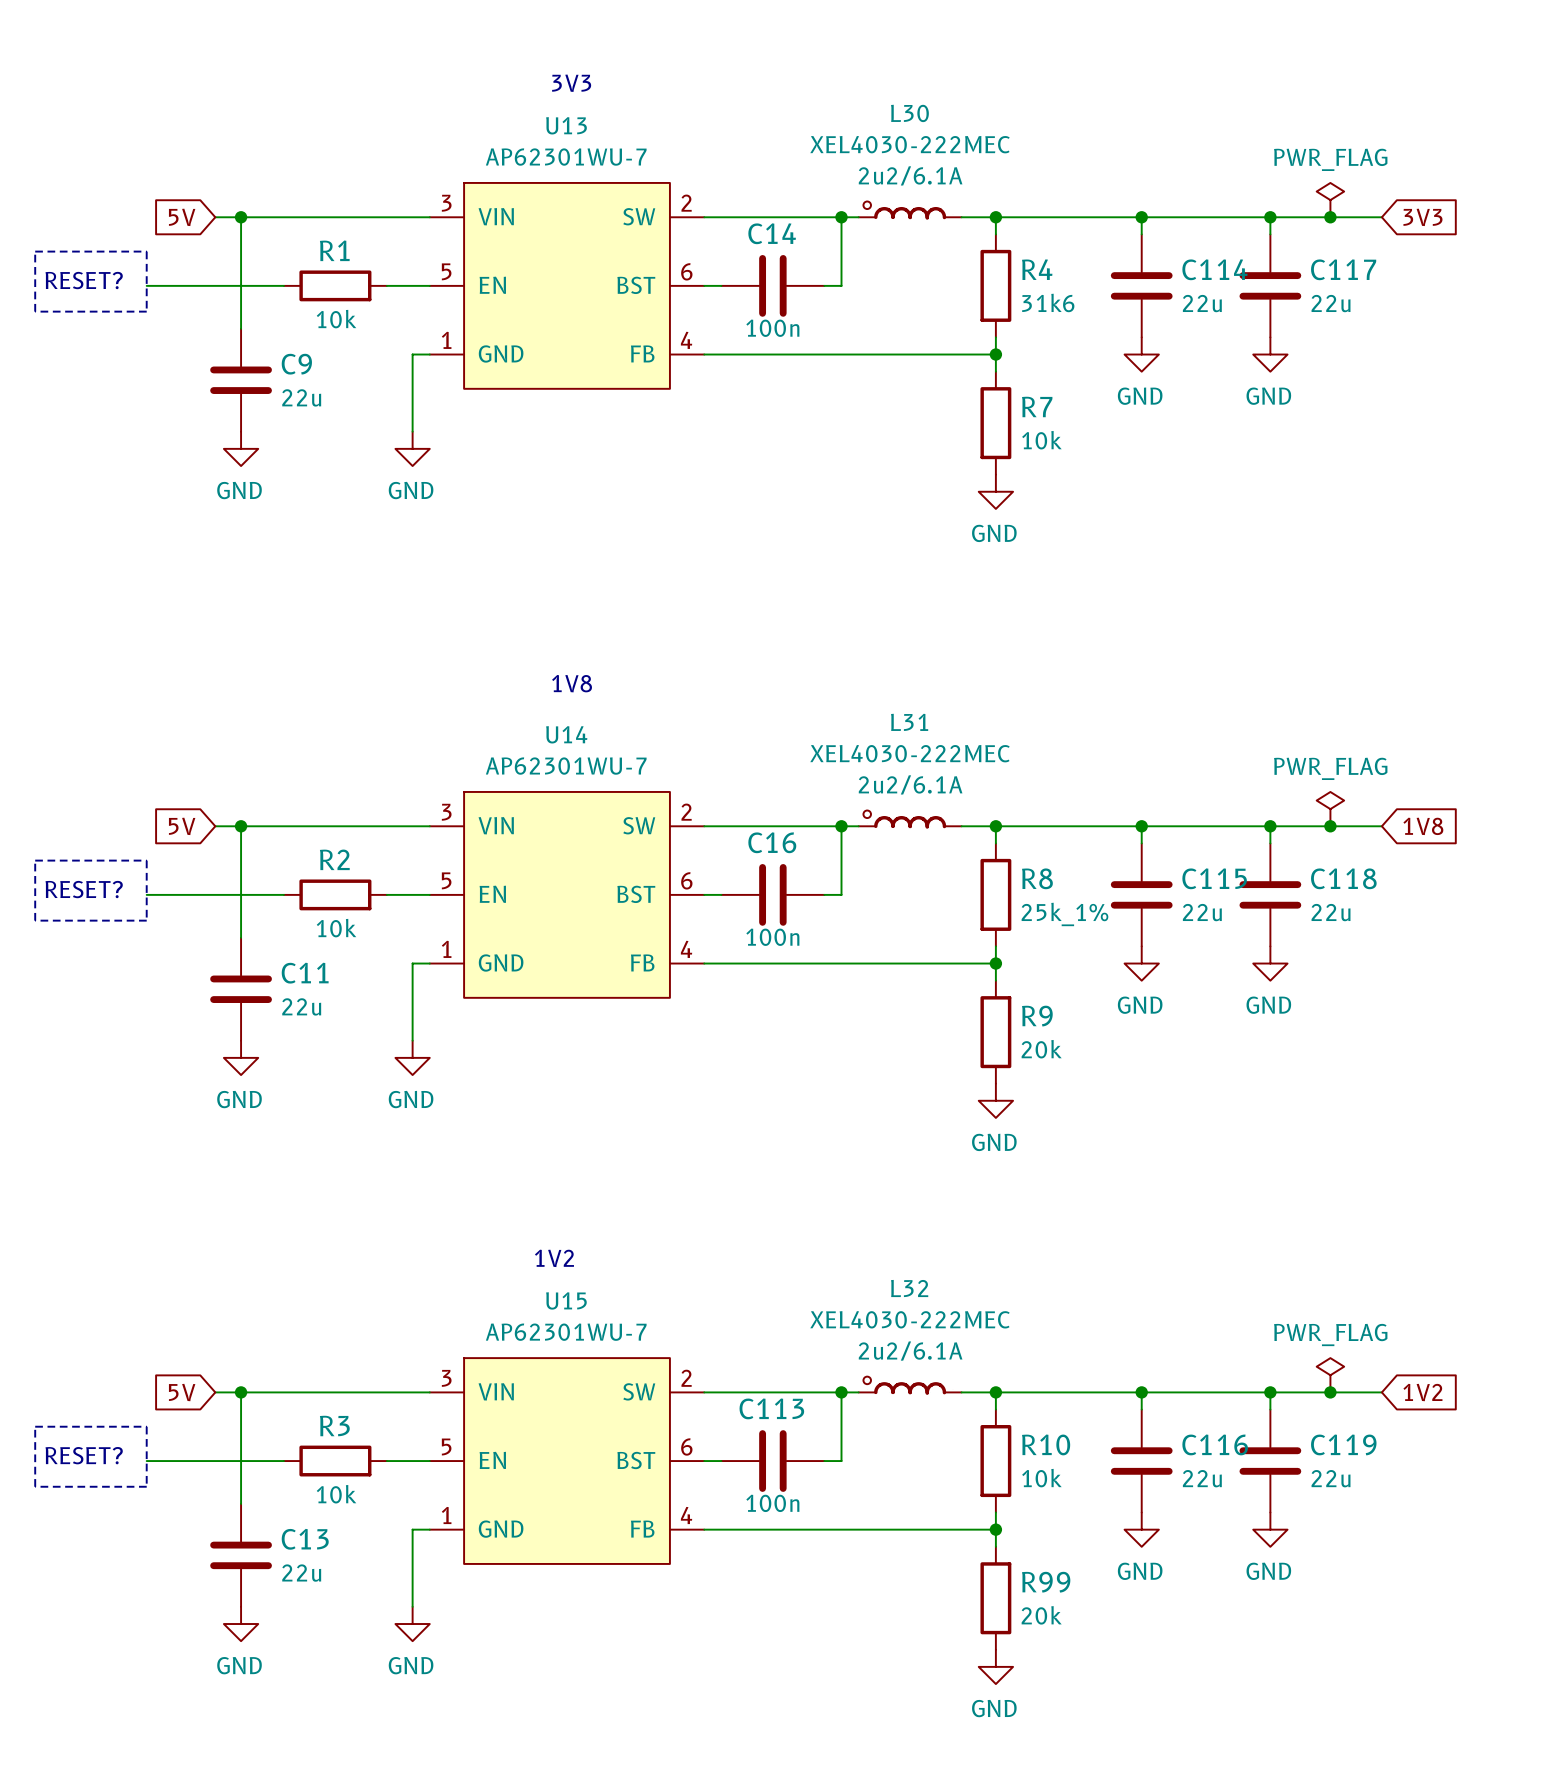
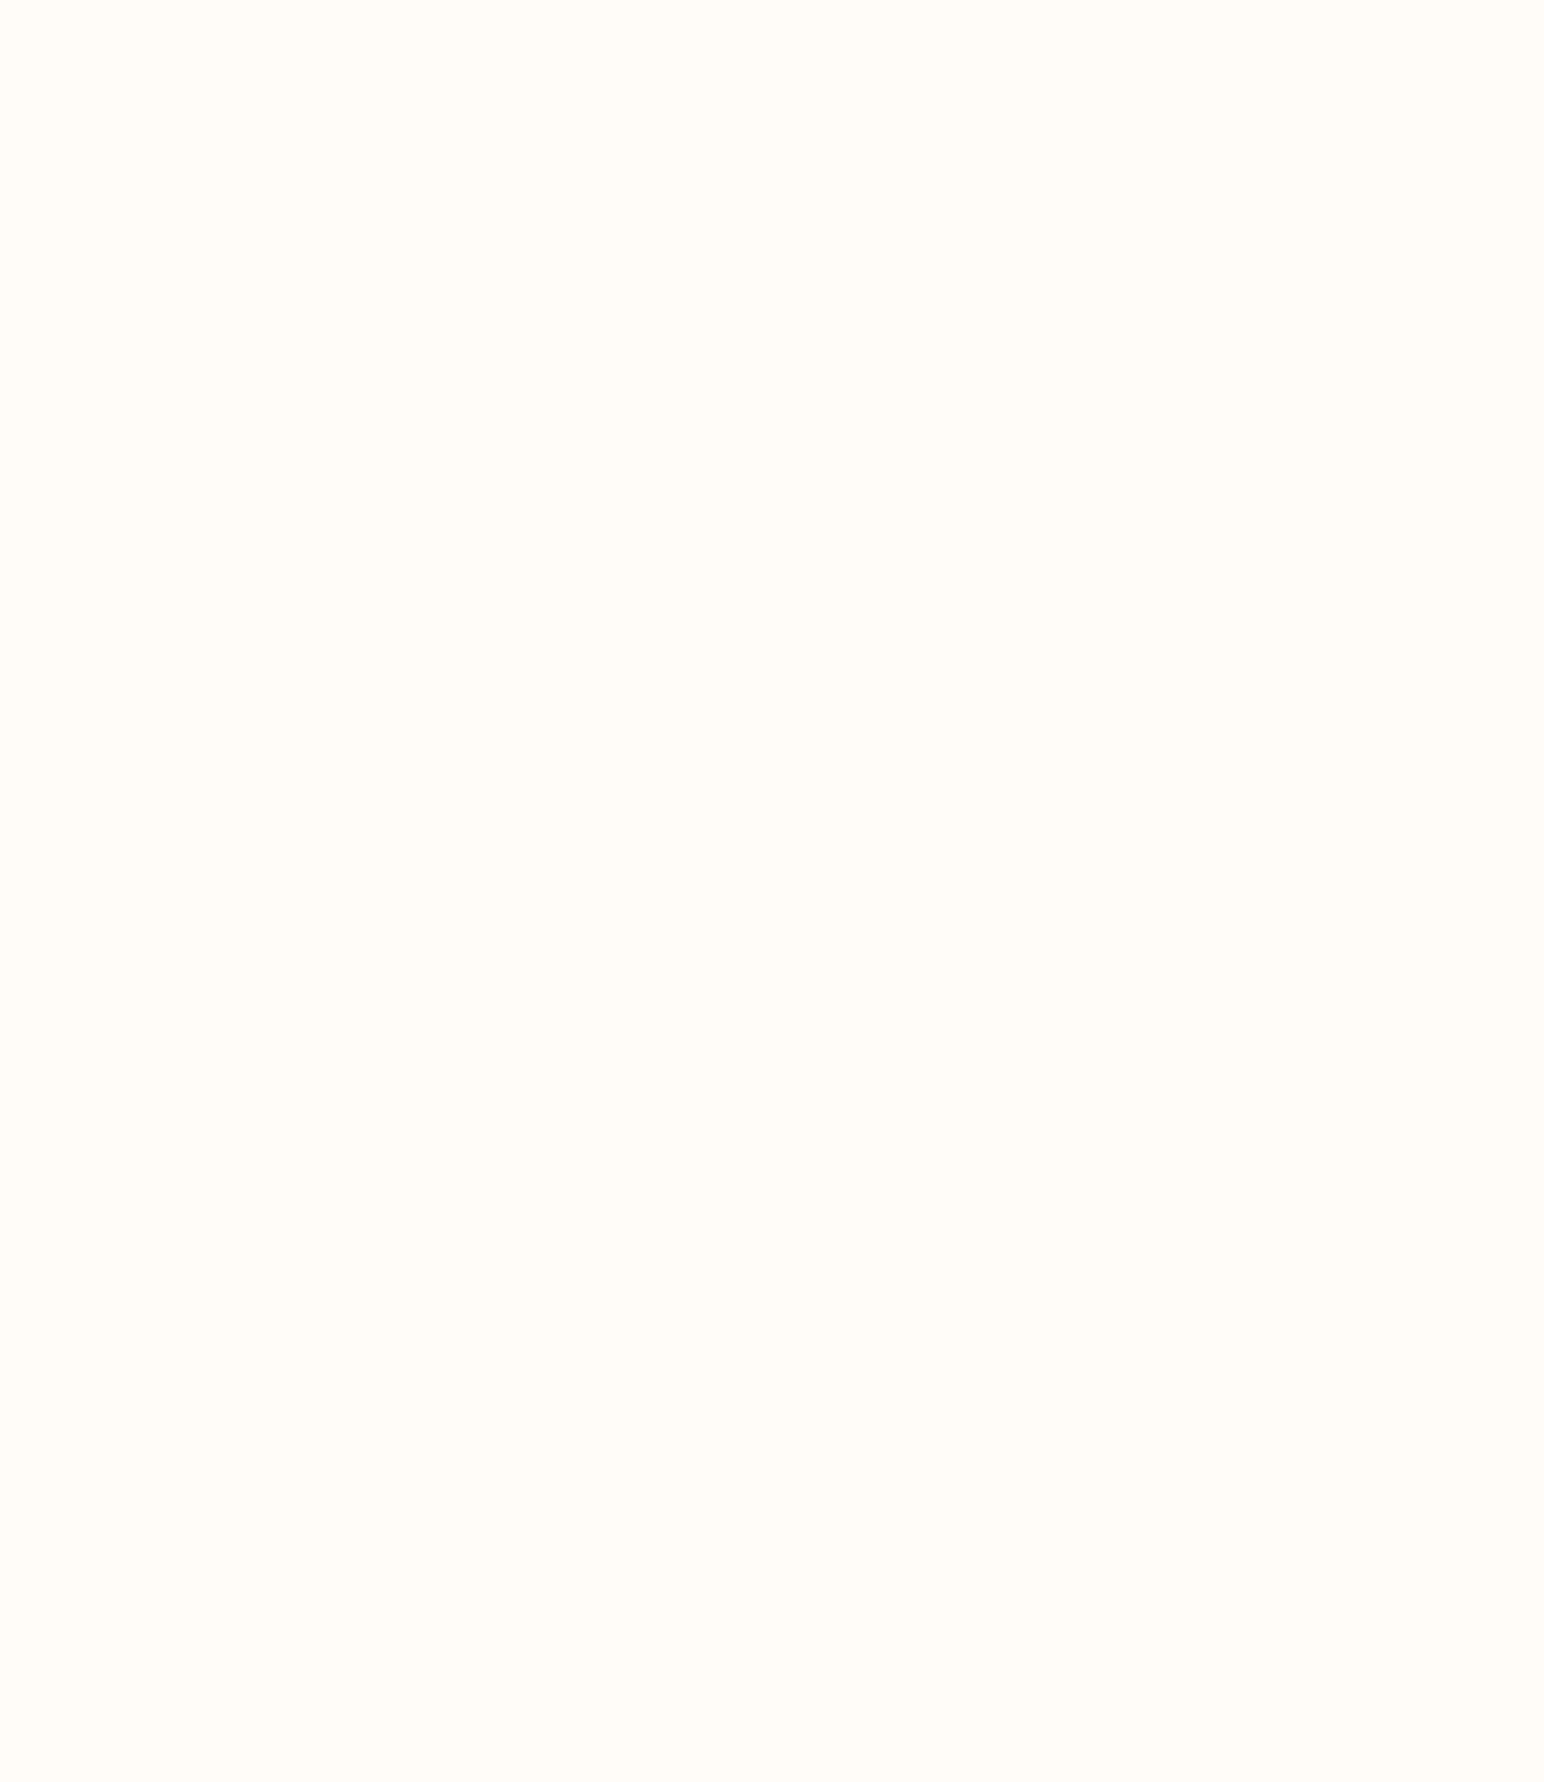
text: 3V3 (571, 83) -> none
power symbol: PWR_FLAG (1330, 200) -> none
L30: XEL4030-222MEC (910, 210) -> none
global label: 5V (182, 217) -> none
wire: (215, 217) (429, 217) -> none
wire: (241, 217) (241, 328) -> none
junction: (241, 217) -> none
wire: (704, 217) (858, 217) -> none
wire: (841, 217) (841, 285) (824, 285) -> none
junction: (841, 217) -> none
wire: (961, 217) (1381, 217) -> none
wire: (995, 217) (995, 234) -> none
junction: (995, 217) -> none
wire: (1141, 217) (1141, 234) -> none
junction: (1141, 217) -> none
wire: (1270, 217) (1270, 234) -> none
junction: (1270, 217) -> none
junction: (1330, 217) -> none
global label: 3V3 (1422, 217) -> none
line: (35, 251) (35, 311) (146, 311) (146, 251) (35, 251) -> none
text: RESET? (84, 280) -> none
wire: (146, 285) (283, 285) -> none
R1: (335, 285) -> none
wire: (386, 285) (429, 285) -> none
U13: AP62301WU-7 (567, 285) -> none
wire: (704, 285) (721, 285) -> none
C14: (772, 285) -> none
R4: (995, 285) -> none
C114: (1141, 285) -> none
C117: (1270, 285) -> none
wire: (995, 337) (995, 371) -> none
wire: (429, 354) (412, 354) (412, 431) -> none
wire: (704, 354) (995, 354) -> none
junction: (995, 354) -> none
power symbol: GND (1141, 354) -> none
power symbol: GND (1270, 354) -> none
C9: (241, 380) -> none
R7: (995, 423) -> none
power symbol: GND (241, 448) -> none
power symbol: GND (412, 448) -> none
power symbol: GND (995, 491) -> none
text: 1V8 (572, 683) -> none
power symbol: PWR_FLAG (1330, 809) -> none
L31: XEL4030-222MEC (910, 819) -> none
global label: 5V (182, 826) -> none
wire: (215, 826) (429, 826) -> none
wire: (241, 826) (241, 937) -> none
junction: (241, 826) -> none
wire: (704, 826) (858, 826) -> none
wire: (841, 826) (841, 894) (824, 894) -> none
junction: (841, 826) -> none
wire: (961, 826) (1381, 826) -> none
wire: (995, 826) (995, 843) -> none
junction: (995, 826) -> none
wire: (1141, 826) (1141, 843) -> none
junction: (1141, 826) -> none
wire: (1270, 826) (1270, 843) -> none
junction: (1270, 826) -> none
junction: (1330, 826) -> none
global label: 1V8 (1423, 826) -> none
line: (35, 860) (35, 920) (146, 920) (146, 860) (35, 860) -> none
text: RESET? (84, 889) -> none
wire: (146, 894) (283, 894) -> none
R2: (335, 894) -> none
wire: (386, 894) (429, 894) -> none
U14: AP62301WU-7 (567, 894) -> none
wire: (704, 894) (721, 894) -> none
C16: (772, 894) -> none
R8: (995, 894) -> none
C115: (1141, 894) -> none
C118: (1270, 894) -> none
wire: (995, 946) (995, 980) -> none
wire: (429, 963) (412, 963) (412, 1040) -> none
wire: (704, 963) (995, 963) -> none
junction: (995, 963) -> none
power symbol: GND (1141, 963) -> none
power symbol: GND (1270, 963) -> none
C11: (241, 989) -> none
R9: (995, 1032) -> none
power symbol: GND (241, 1057) -> none
power symbol: GND (412, 1057) -> none
power symbol: GND (995, 1100) -> none
text: 1V2 (554, 1258) -> none
power symbol: PWR_FLAG (1330, 1375) -> none
L32: XEL4030-222MEC (910, 1385) -> none
global label: 5V (182, 1392) -> none
wire: (215, 1392) (429, 1392) -> none
wire: (241, 1392) (241, 1503) -> none
junction: (241, 1392) -> none
wire: (704, 1392) (858, 1392) -> none
wire: (841, 1392) (841, 1461) (824, 1461) -> none
junction: (841, 1392) -> none
wire: (961, 1392) (1381, 1392) -> none
wire: (995, 1392) (995, 1409) -> none
junction: (995, 1392) -> none
wire: (1141, 1392) (1141, 1409) -> none
junction: (1141, 1392) -> none
wire: (1270, 1392) (1270, 1409) -> none
junction: (1270, 1392) -> none
junction: (1330, 1392) -> none
global label: 1V2 (1422, 1392) -> none
line: (35, 1426) (35, 1486) (146, 1486) (146, 1426) (35, 1426) -> none
text: RESET? (84, 1455) -> none
wire: (146, 1461) (283, 1461) -> none
R3: (335, 1461) -> none
wire: (386, 1461) (429, 1461) -> none
U15: AP62301WU-7 (567, 1461) -> none
wire: (704, 1461) (721, 1461) -> none
C113: (772, 1461) -> none
R10: (995, 1461) -> none
C116: (1141, 1461) -> none
C119: (1270, 1461) -> none
wire: (995, 1512) (995, 1546) -> none
wire: (429, 1529) (412, 1529) (412, 1606) -> none
wire: (704, 1529) (995, 1529) -> none
junction: (995, 1529) -> none
power symbol: GND (1141, 1529) -> none
power symbol: GND (1270, 1529) -> none
C13: (241, 1555) -> none
R99: (995, 1598) -> none
power symbol: GND (241, 1624) -> none
power symbol: GND (412, 1624) -> none
power symbol: GND (995, 1666) -> none

